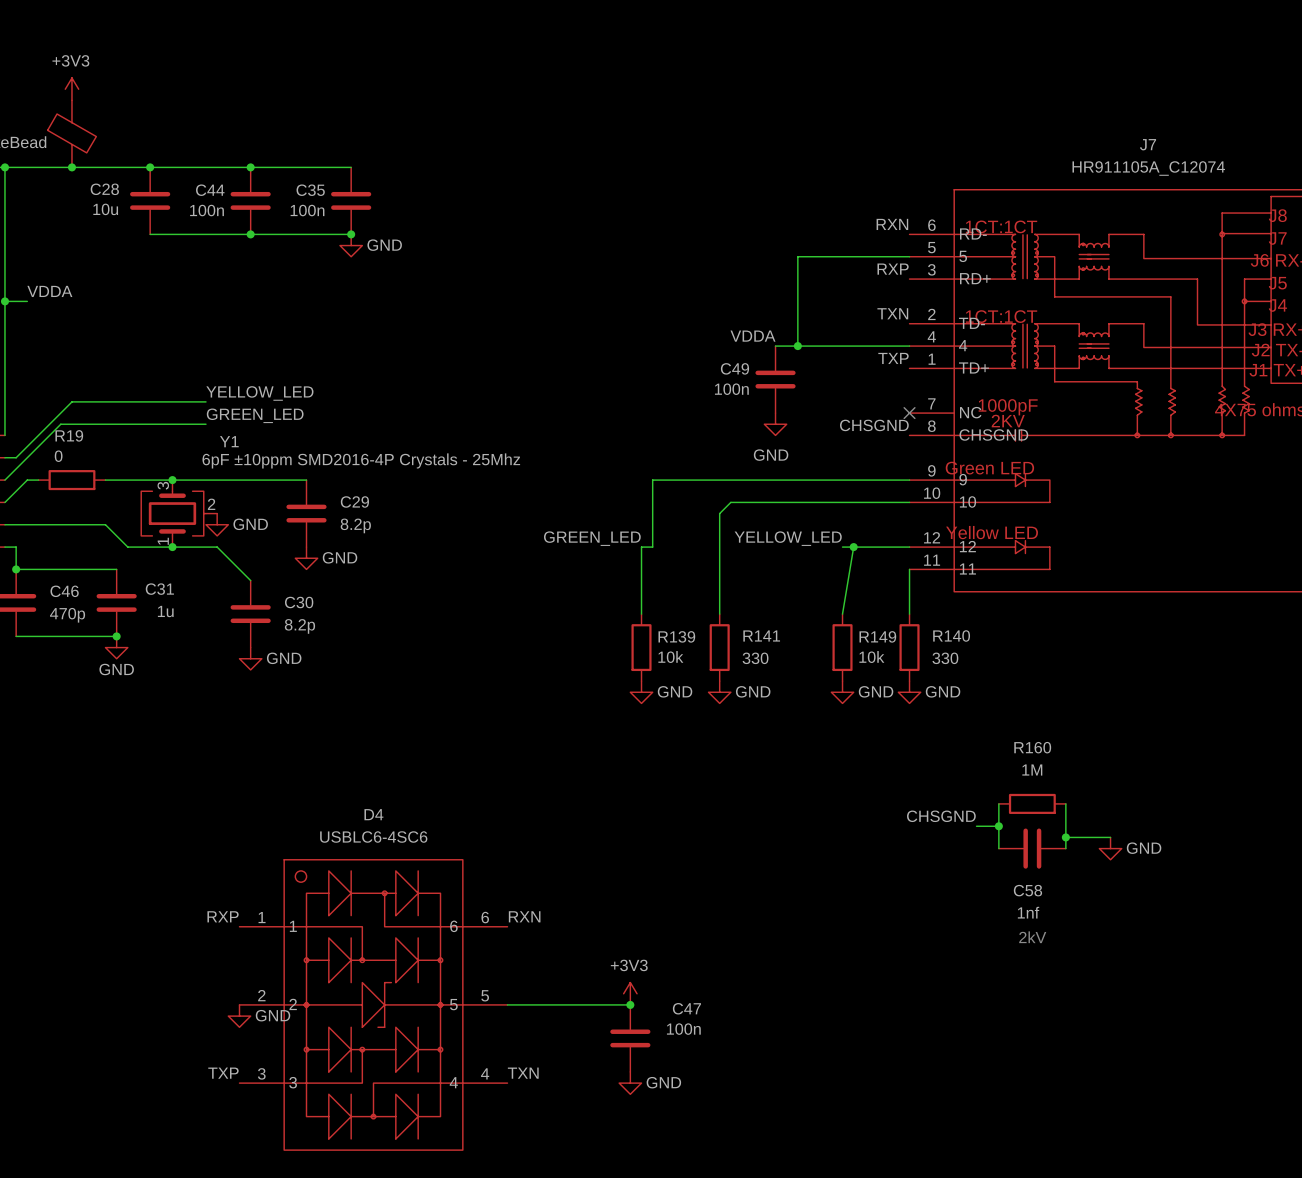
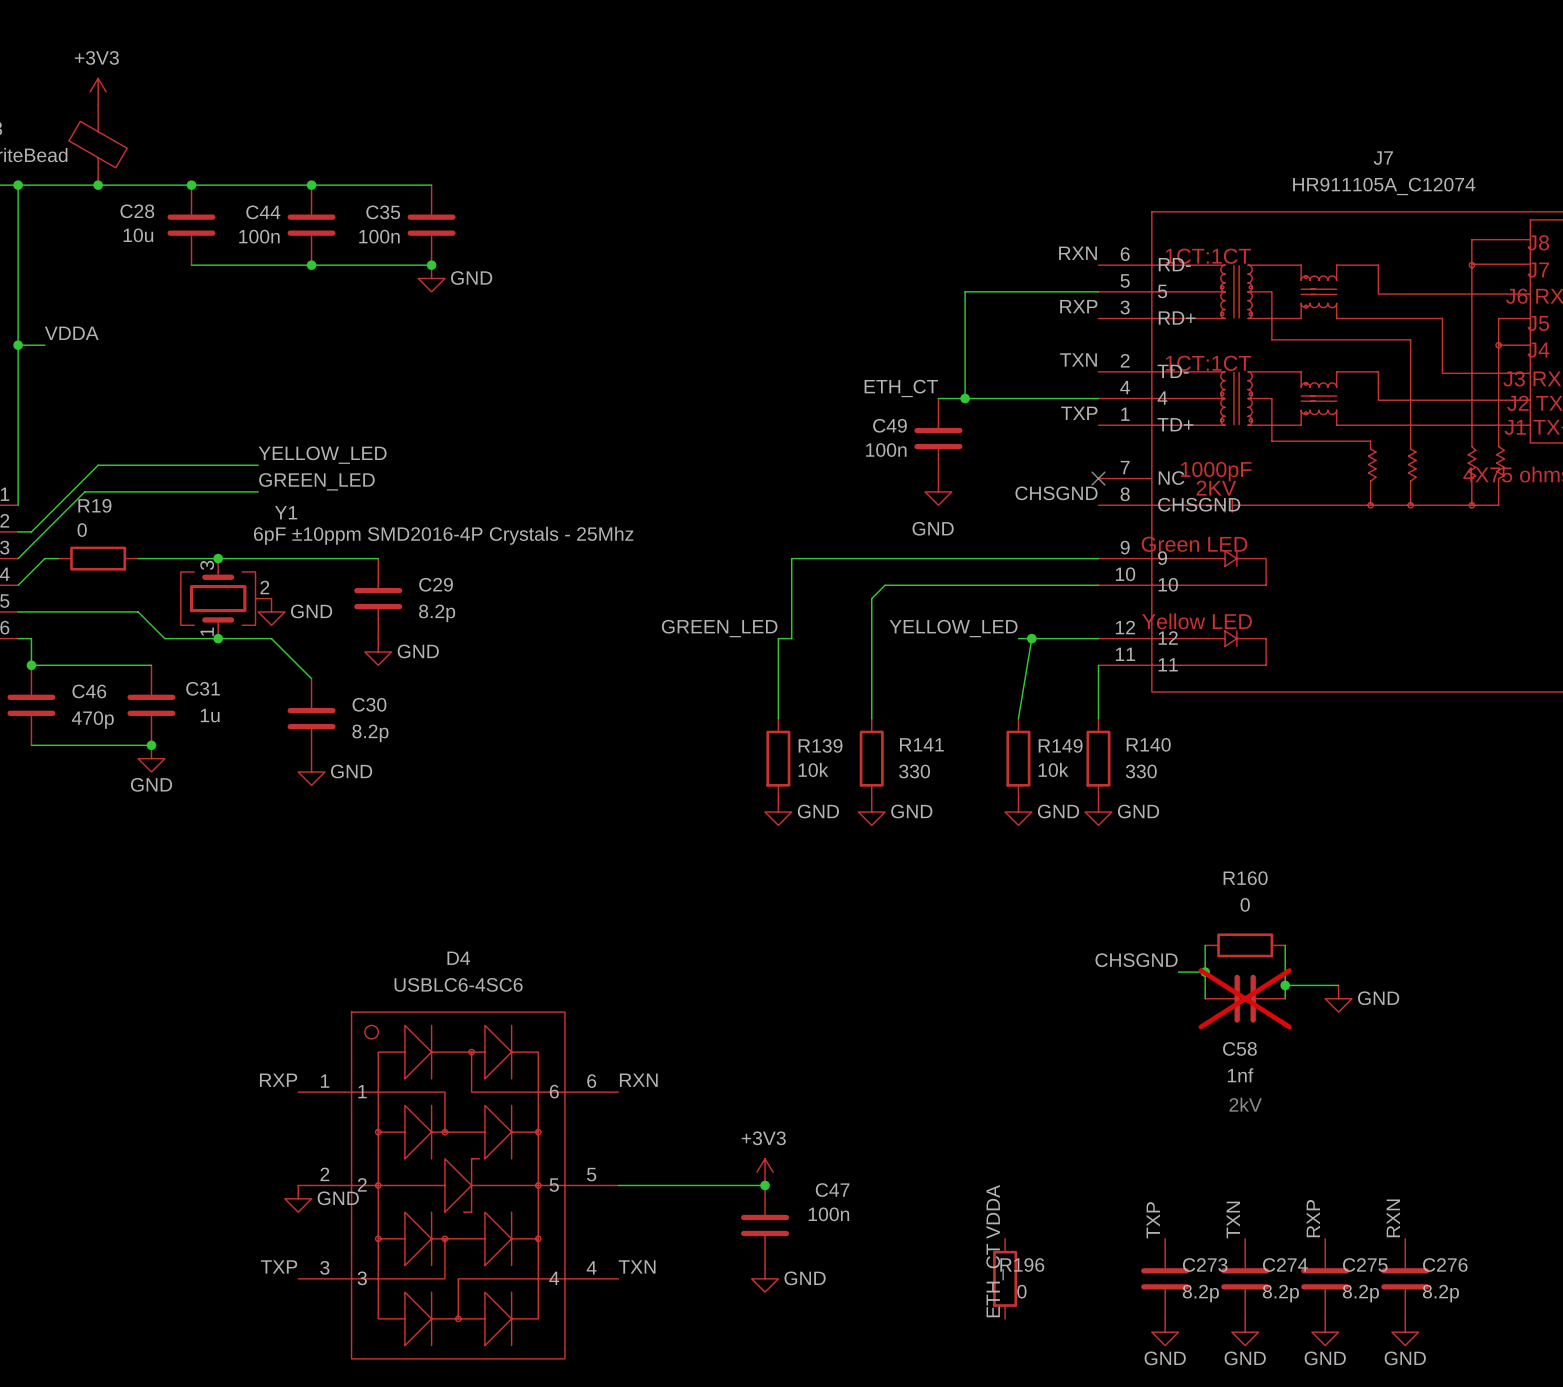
label: VDDA (752, 336) -> ETH_CT (901, 388)
R160 value: 1M (1032, 770) -> 0 (1245, 904)
C58 do-not-place cross: none -> (1245, 998)
label: none -> VDDA (993, 1211)
label: none -> RXP (1313, 1218)
label: none -> RXN (1393, 1218)
label: none -> TXN (1233, 1220)
label: none -> TXP (1153, 1220)
R196: none -> 0 (1005, 1278)
C273: none -> 8.2p (1165, 1278)
C274: none -> 8.2p (1245, 1278)
C275: none -> 8.2p (1325, 1278)
C276: none -> 8.2p (1405, 1278)
label: none -> ETH_CT (995, 1280)
power symbol: none -> GND (1165, 1332)
power symbol: none -> GND (1245, 1332)
power symbol: none -> GND (1325, 1332)
power symbol: none -> GND (1405, 1332)

